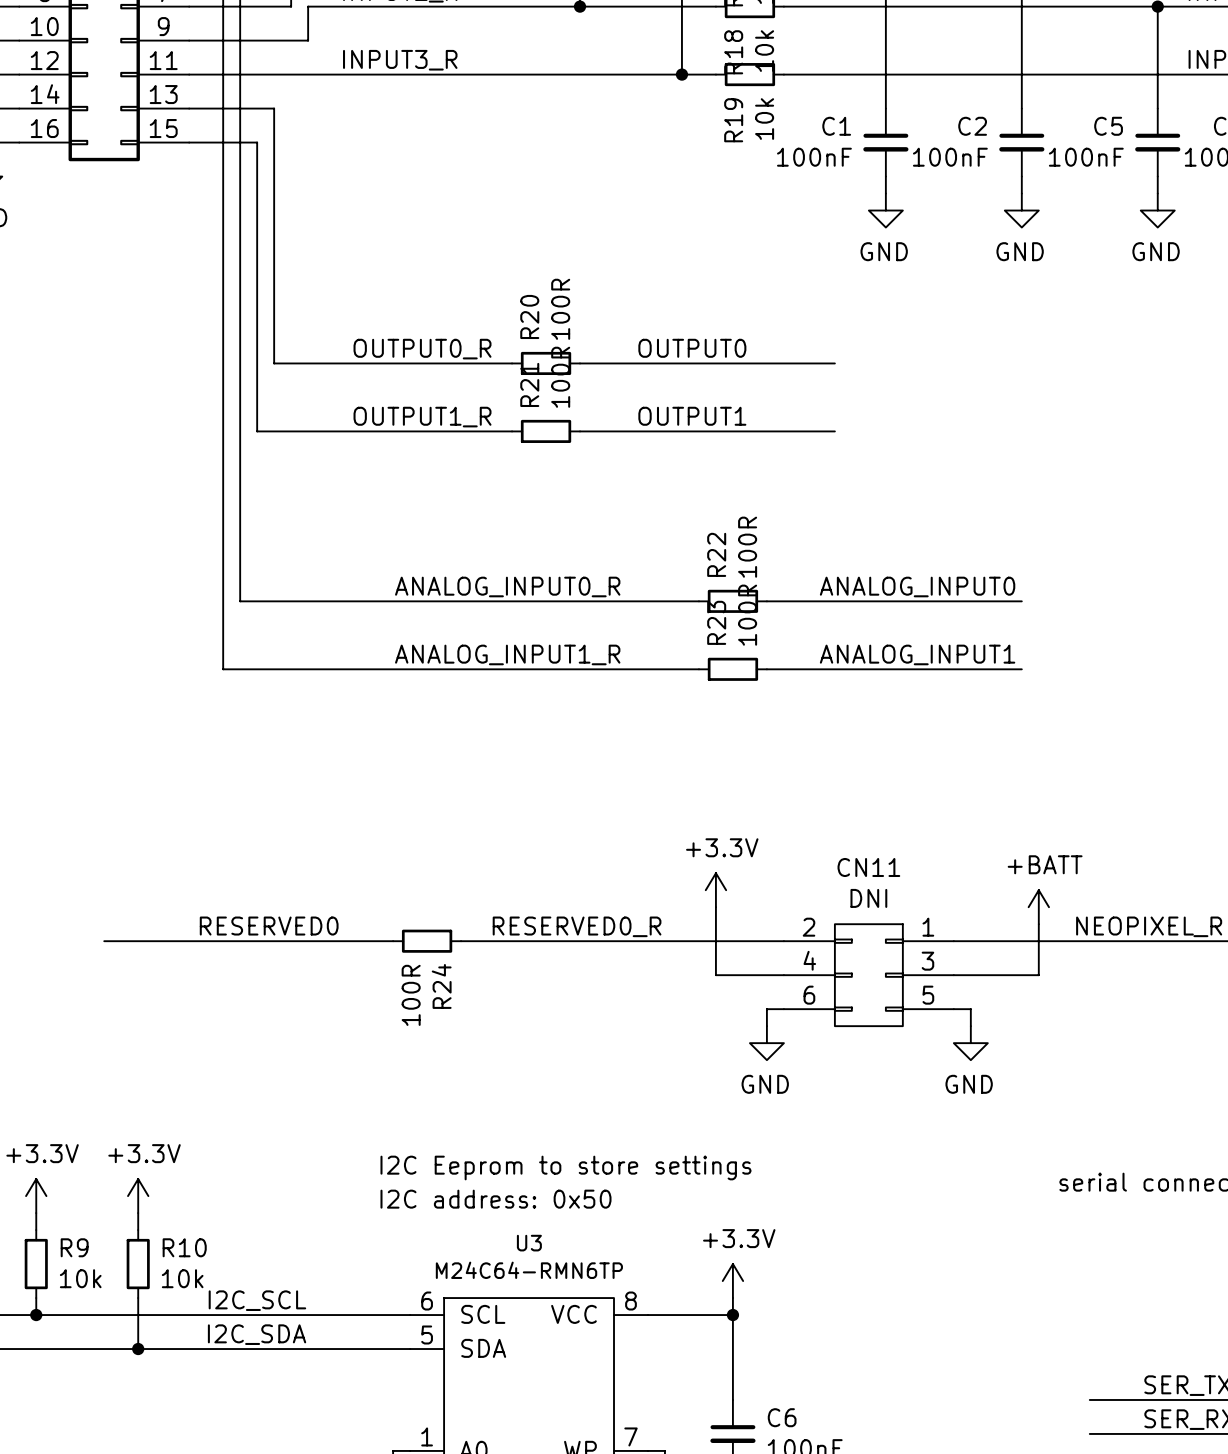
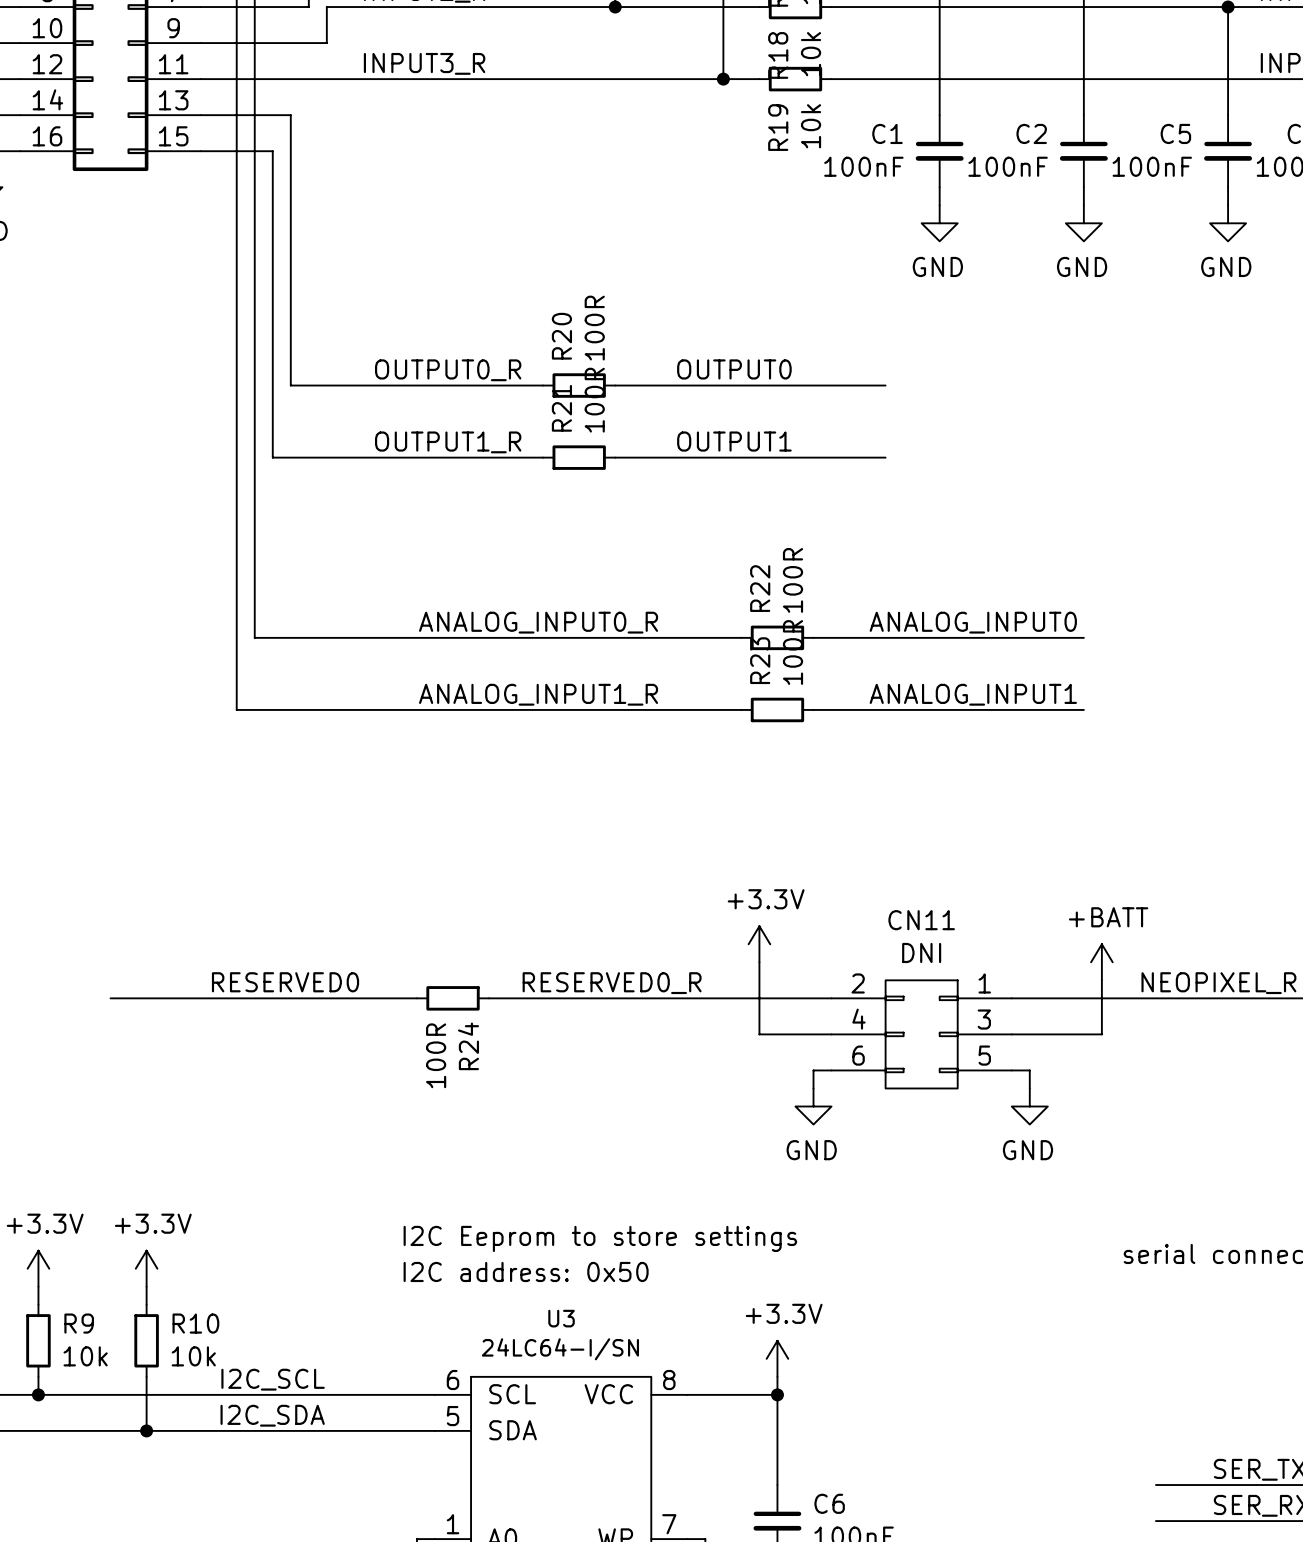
U3 value: M24C64-RMN6TP (529, 1270) -> 24LC64-I/SN (560, 1349)

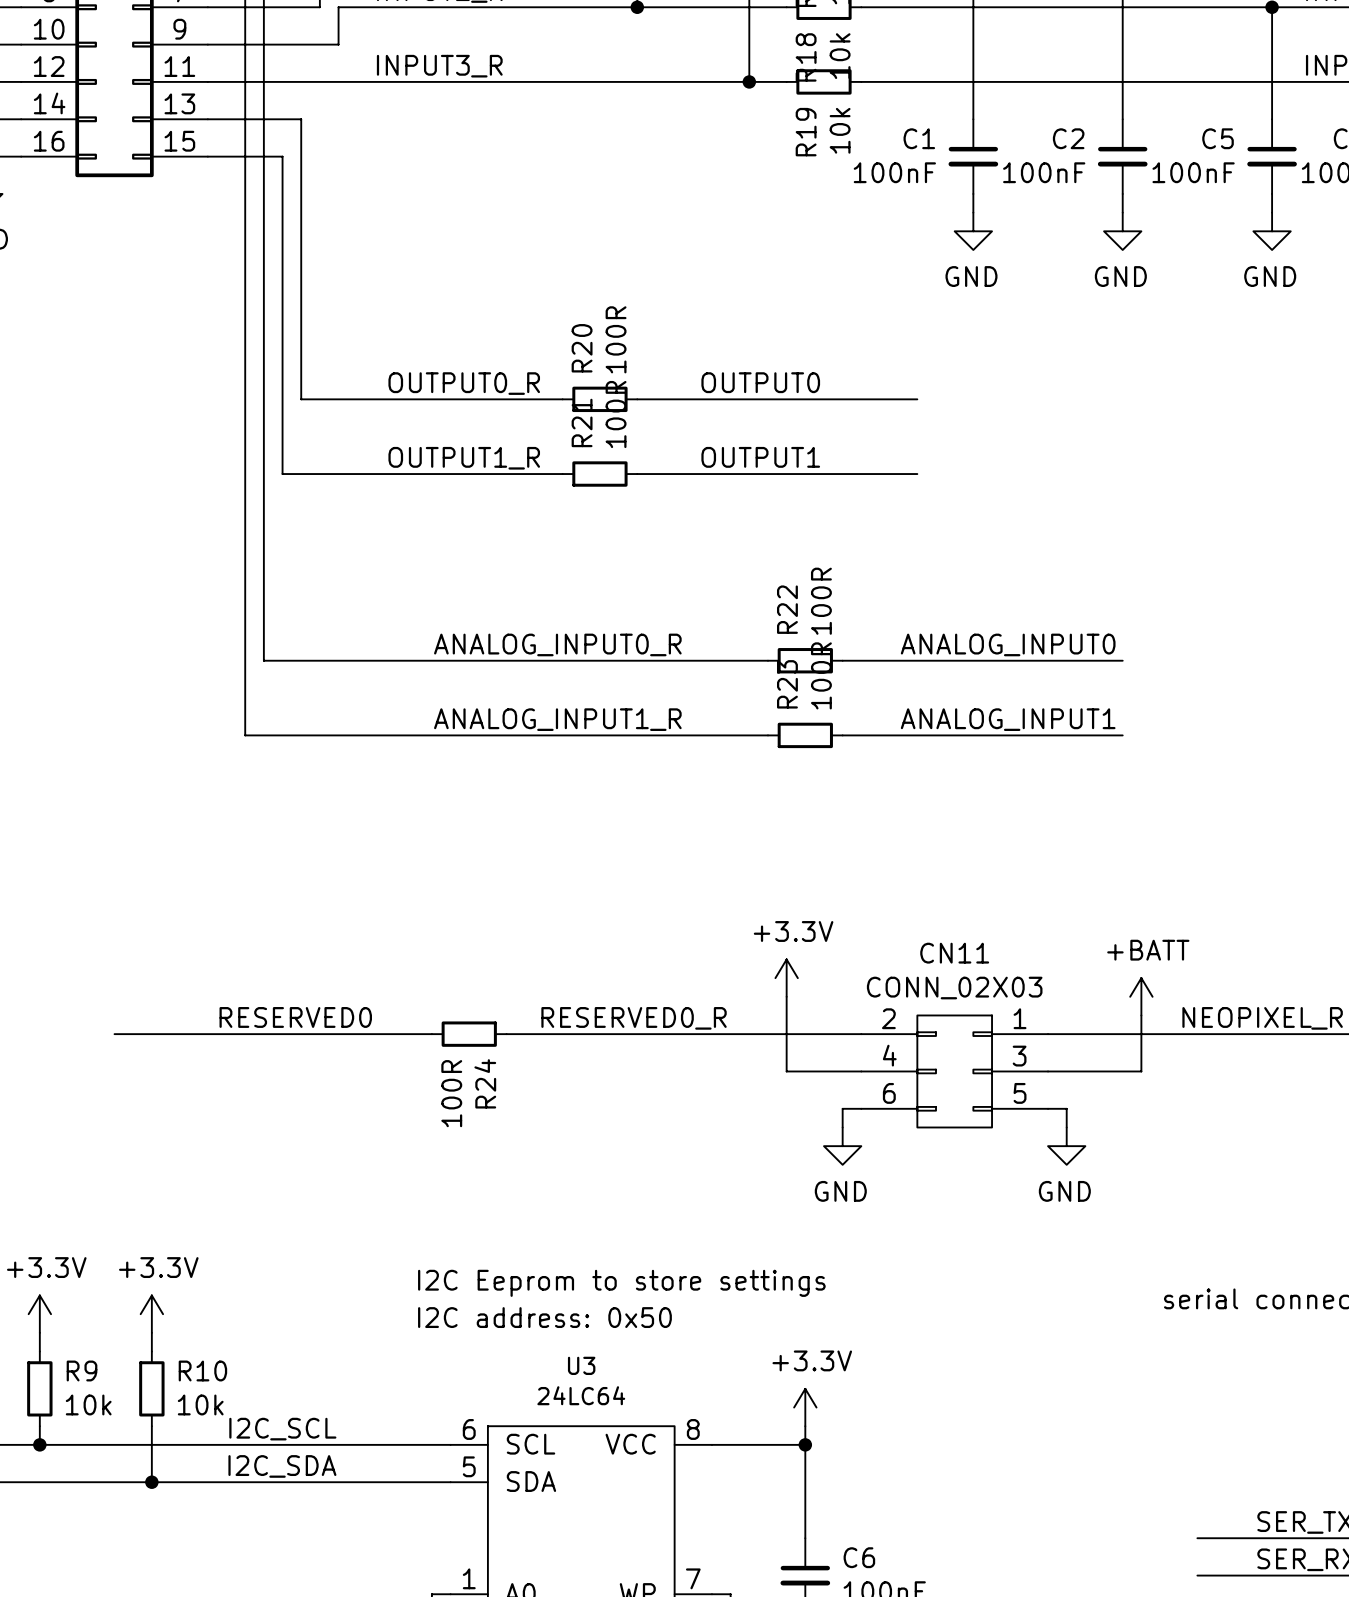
CN11 value: DNI (921, 952) -> CONN_02X03 (954, 988)
U3 value: 24LC64-I/SN (560, 1349) -> 24LC64 (581, 1395)

